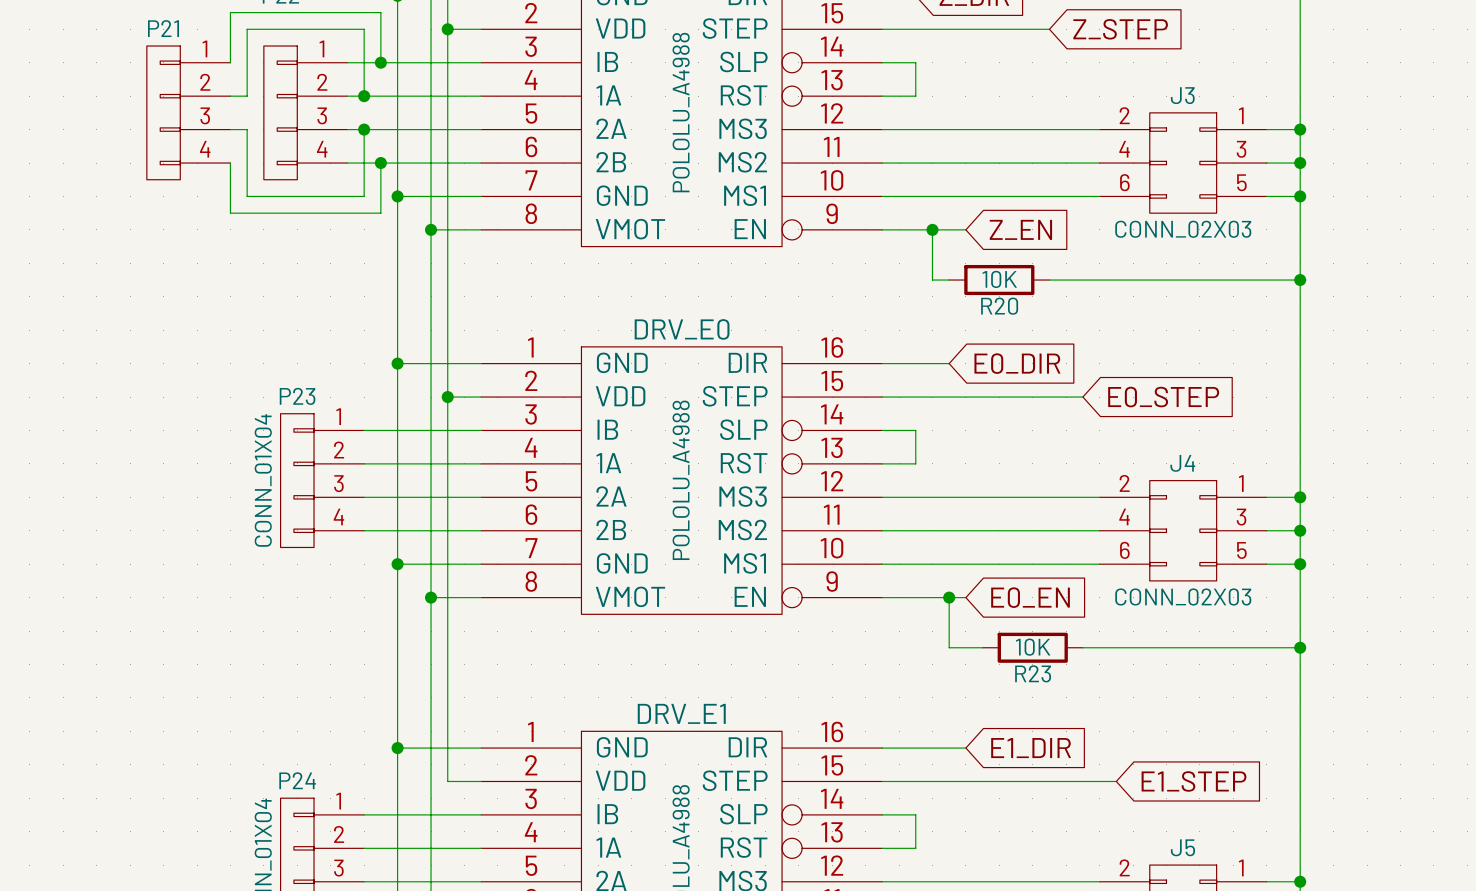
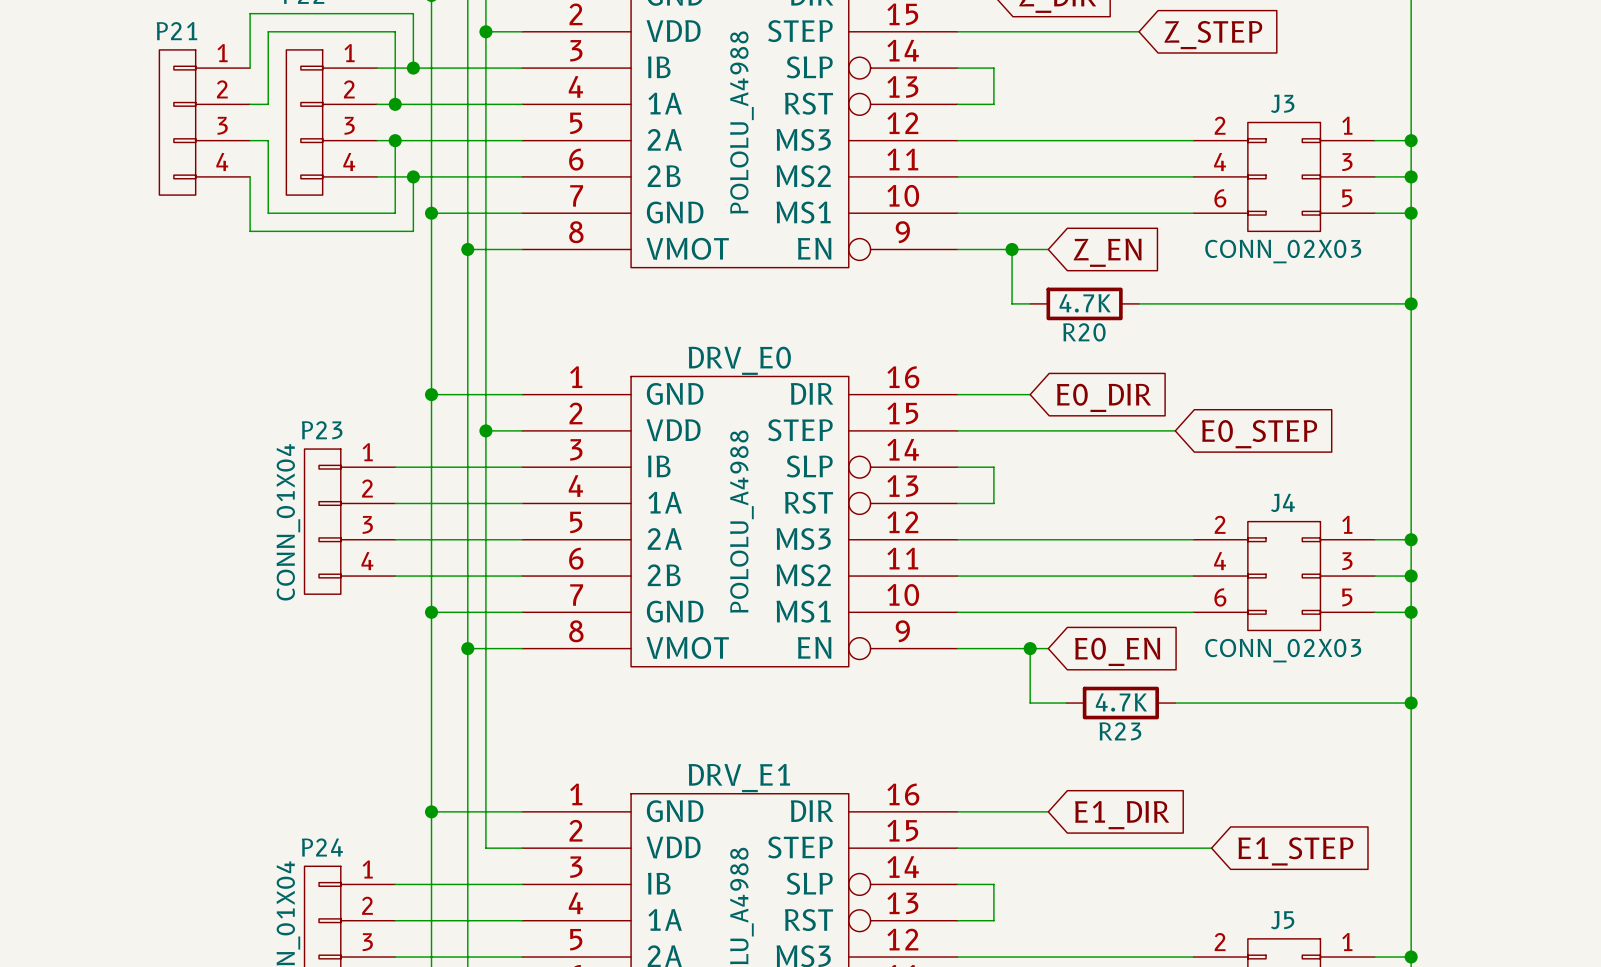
R20 value: 10K (999, 279) -> 4.7K (1085, 303)
R23 value: 10K (1033, 647) -> 4.7K (1121, 702)

